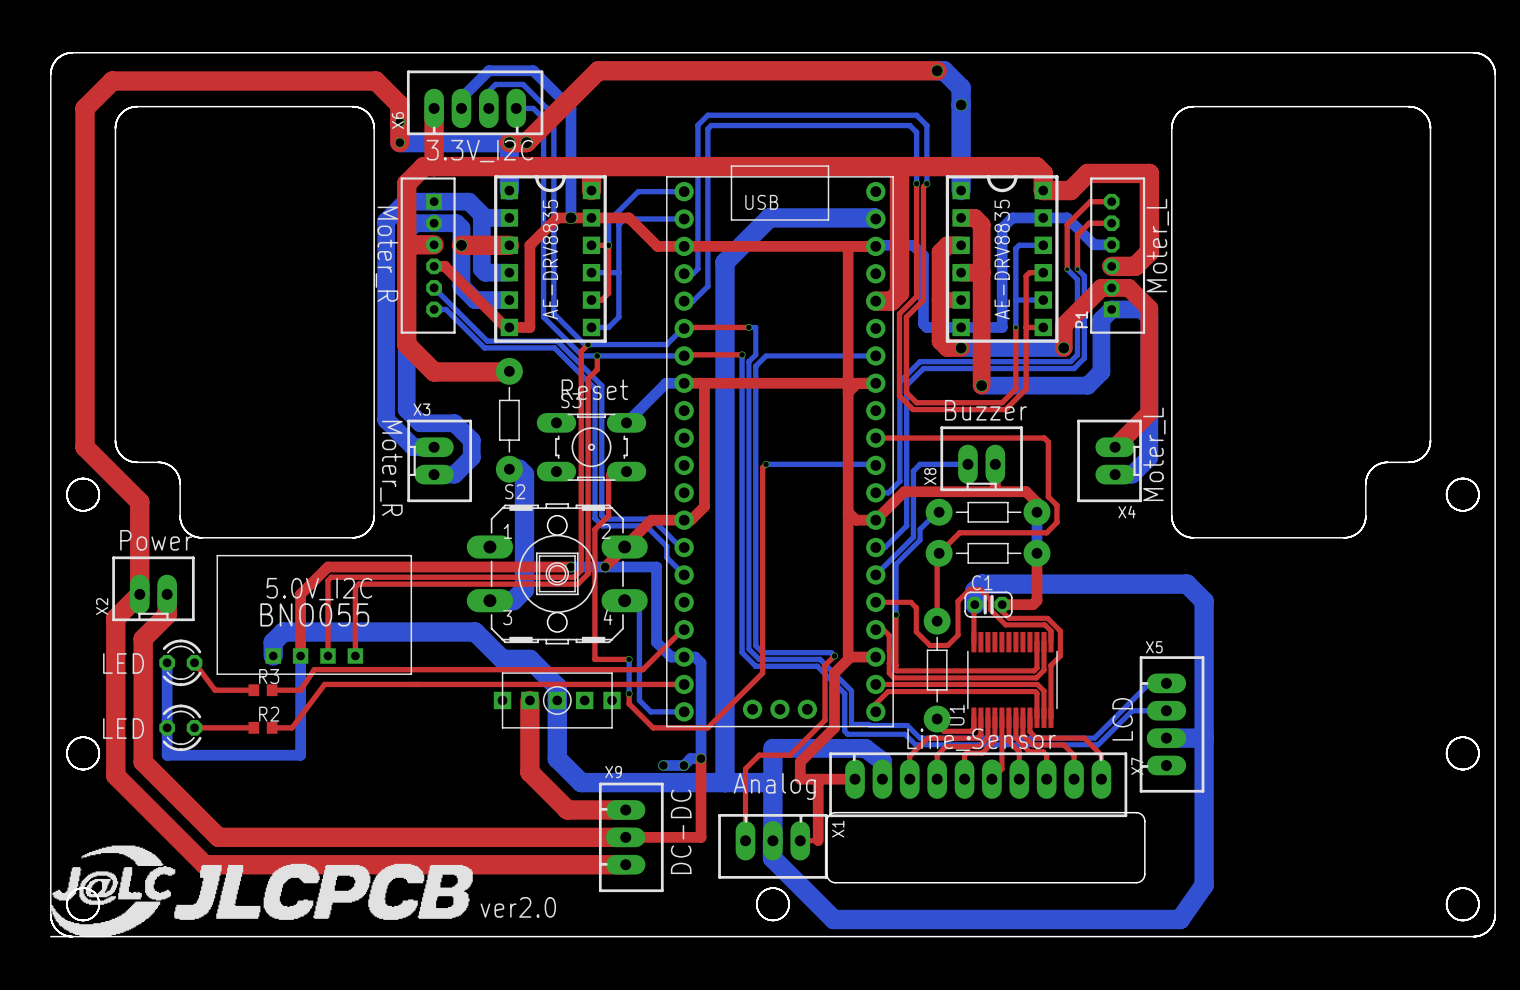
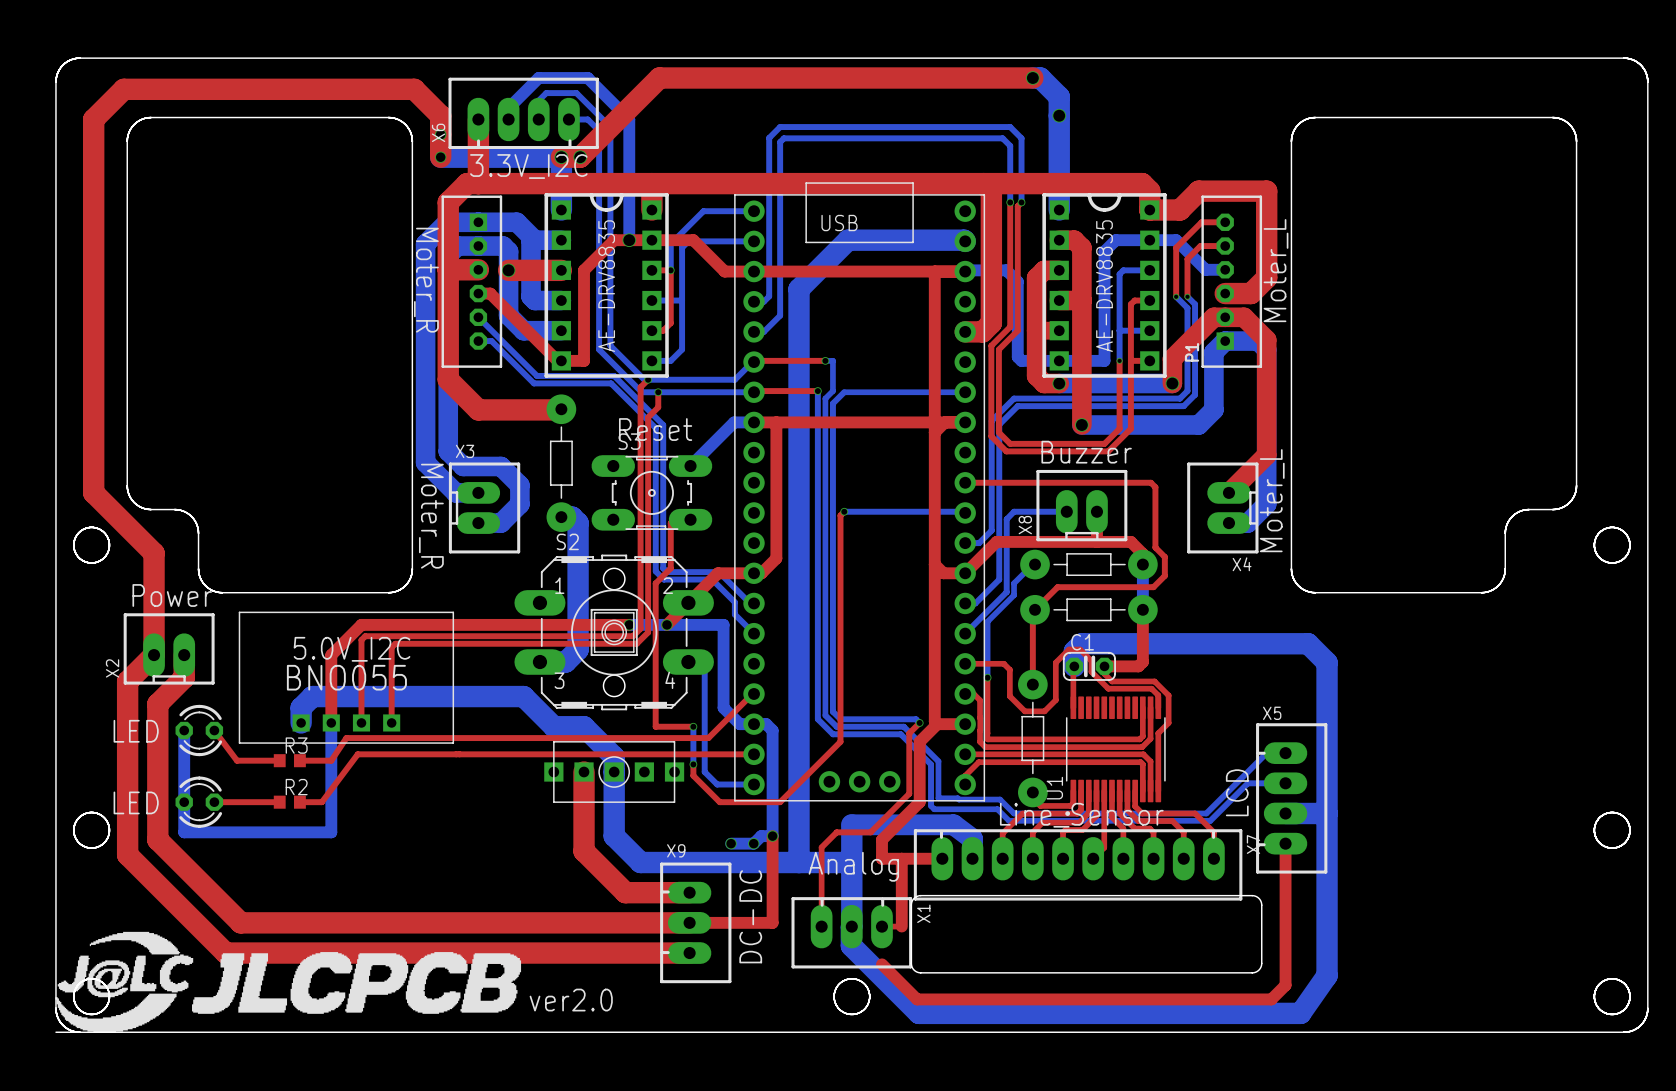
top track: none -> (1285, 843) (1285, 985) (1271, 999) (917, 999) (881, 964)

